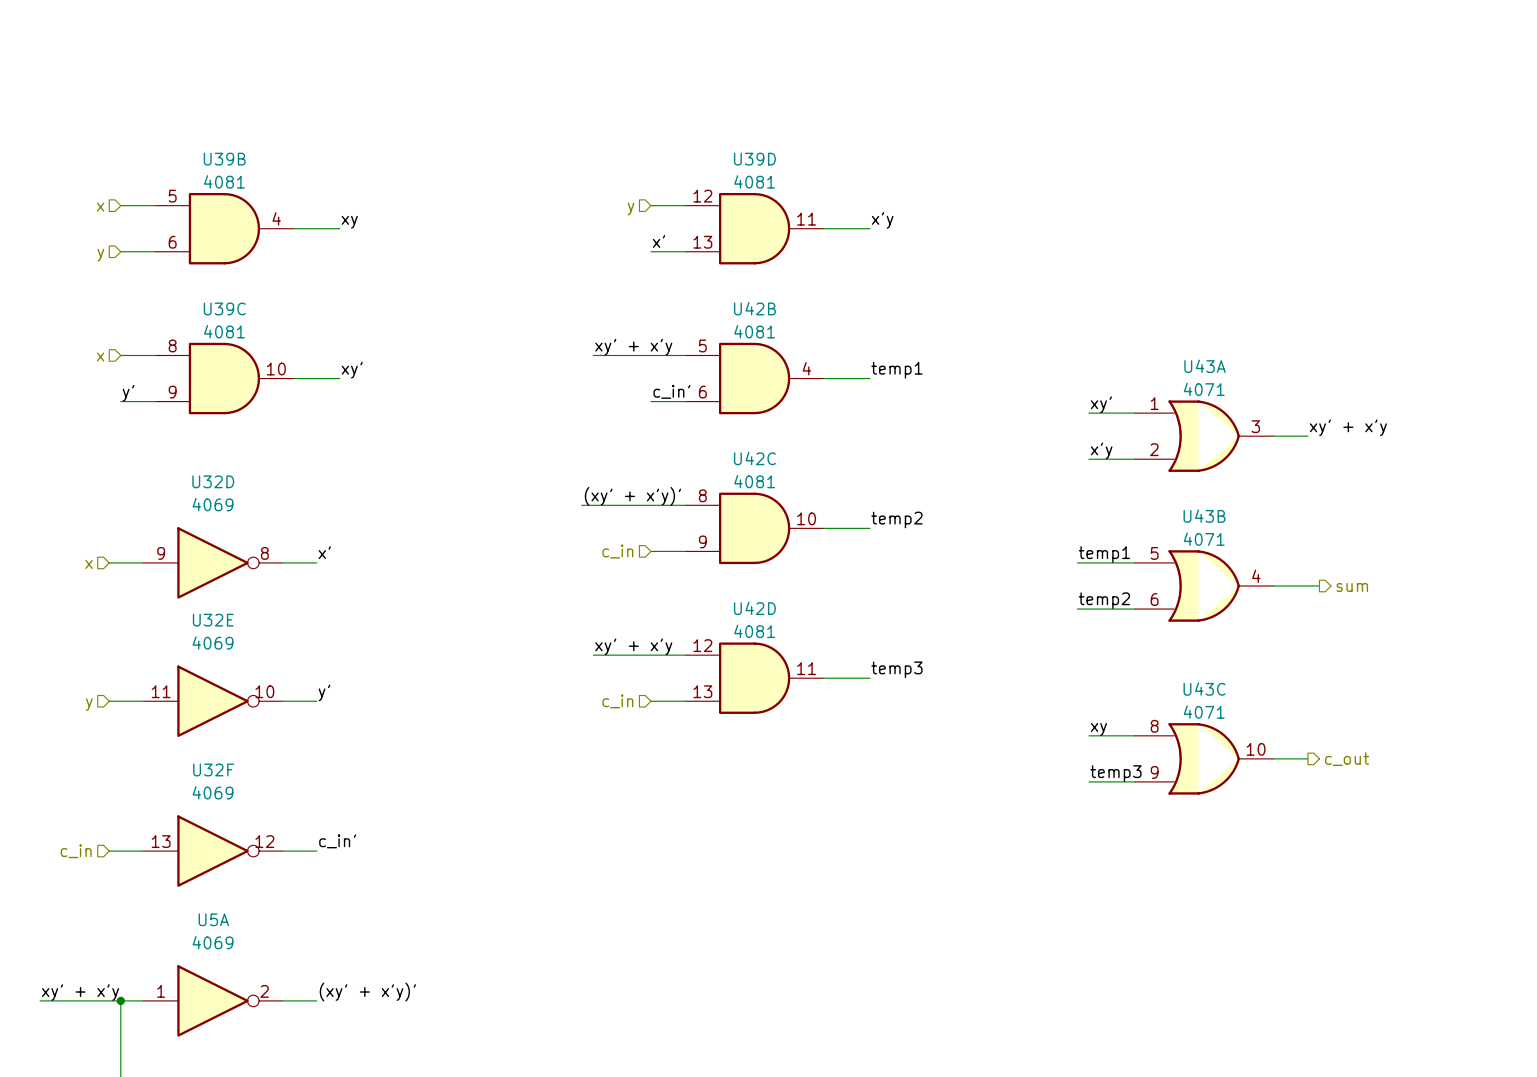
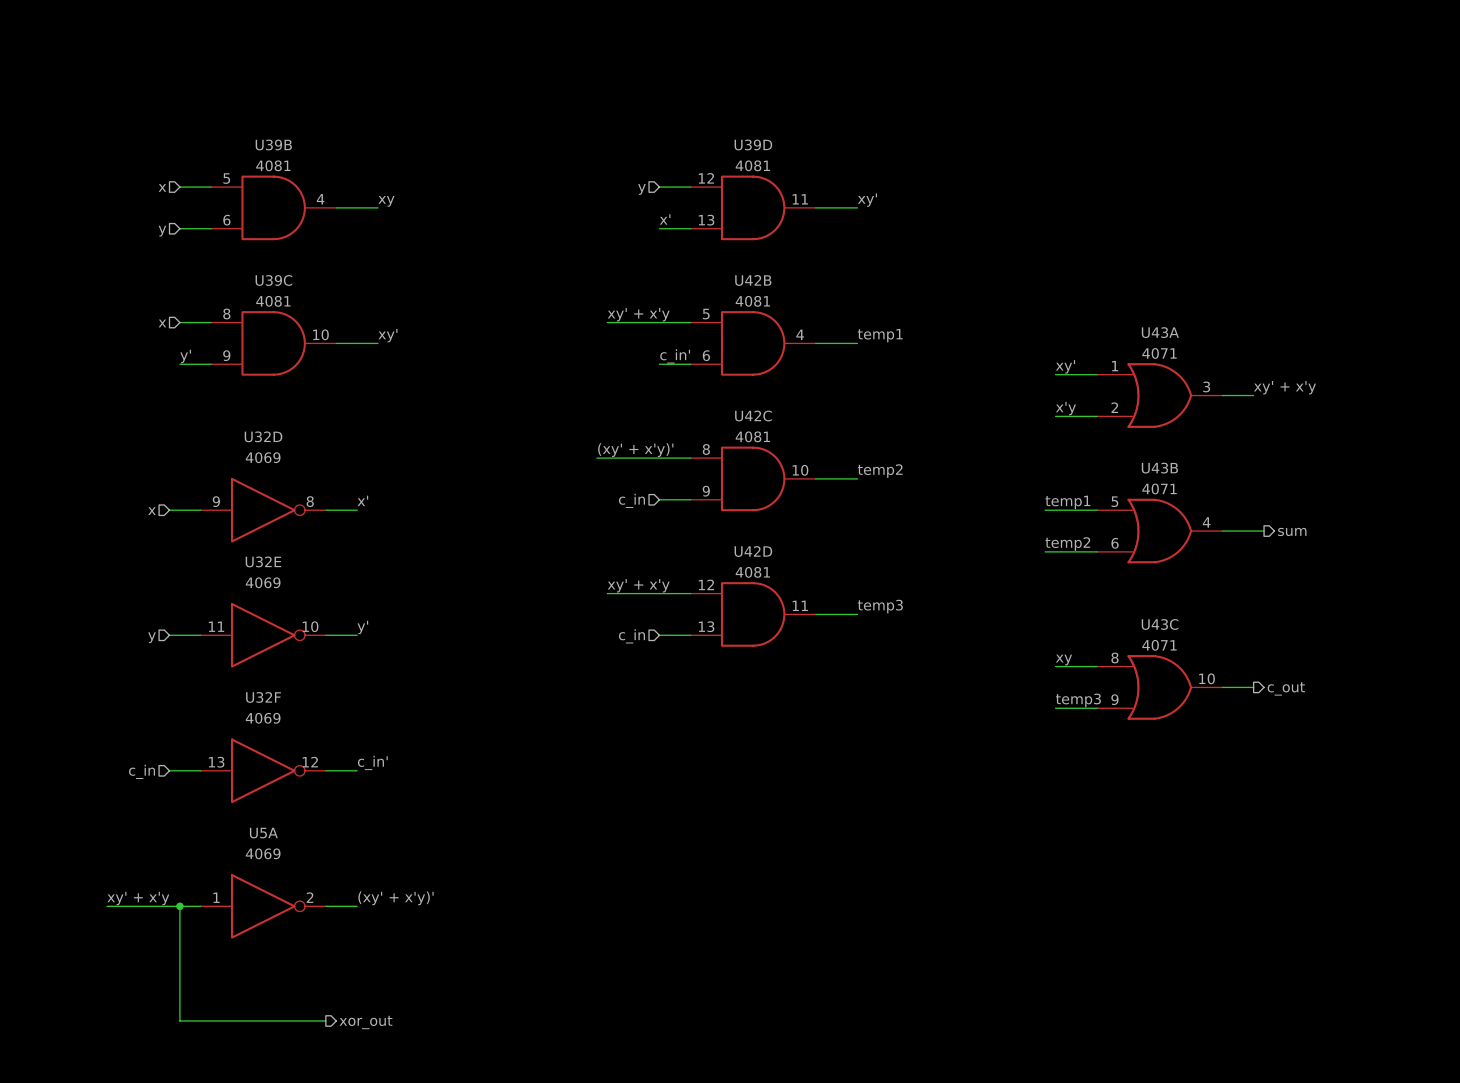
label: x'y (882, 220) -> xy' (867, 200)

